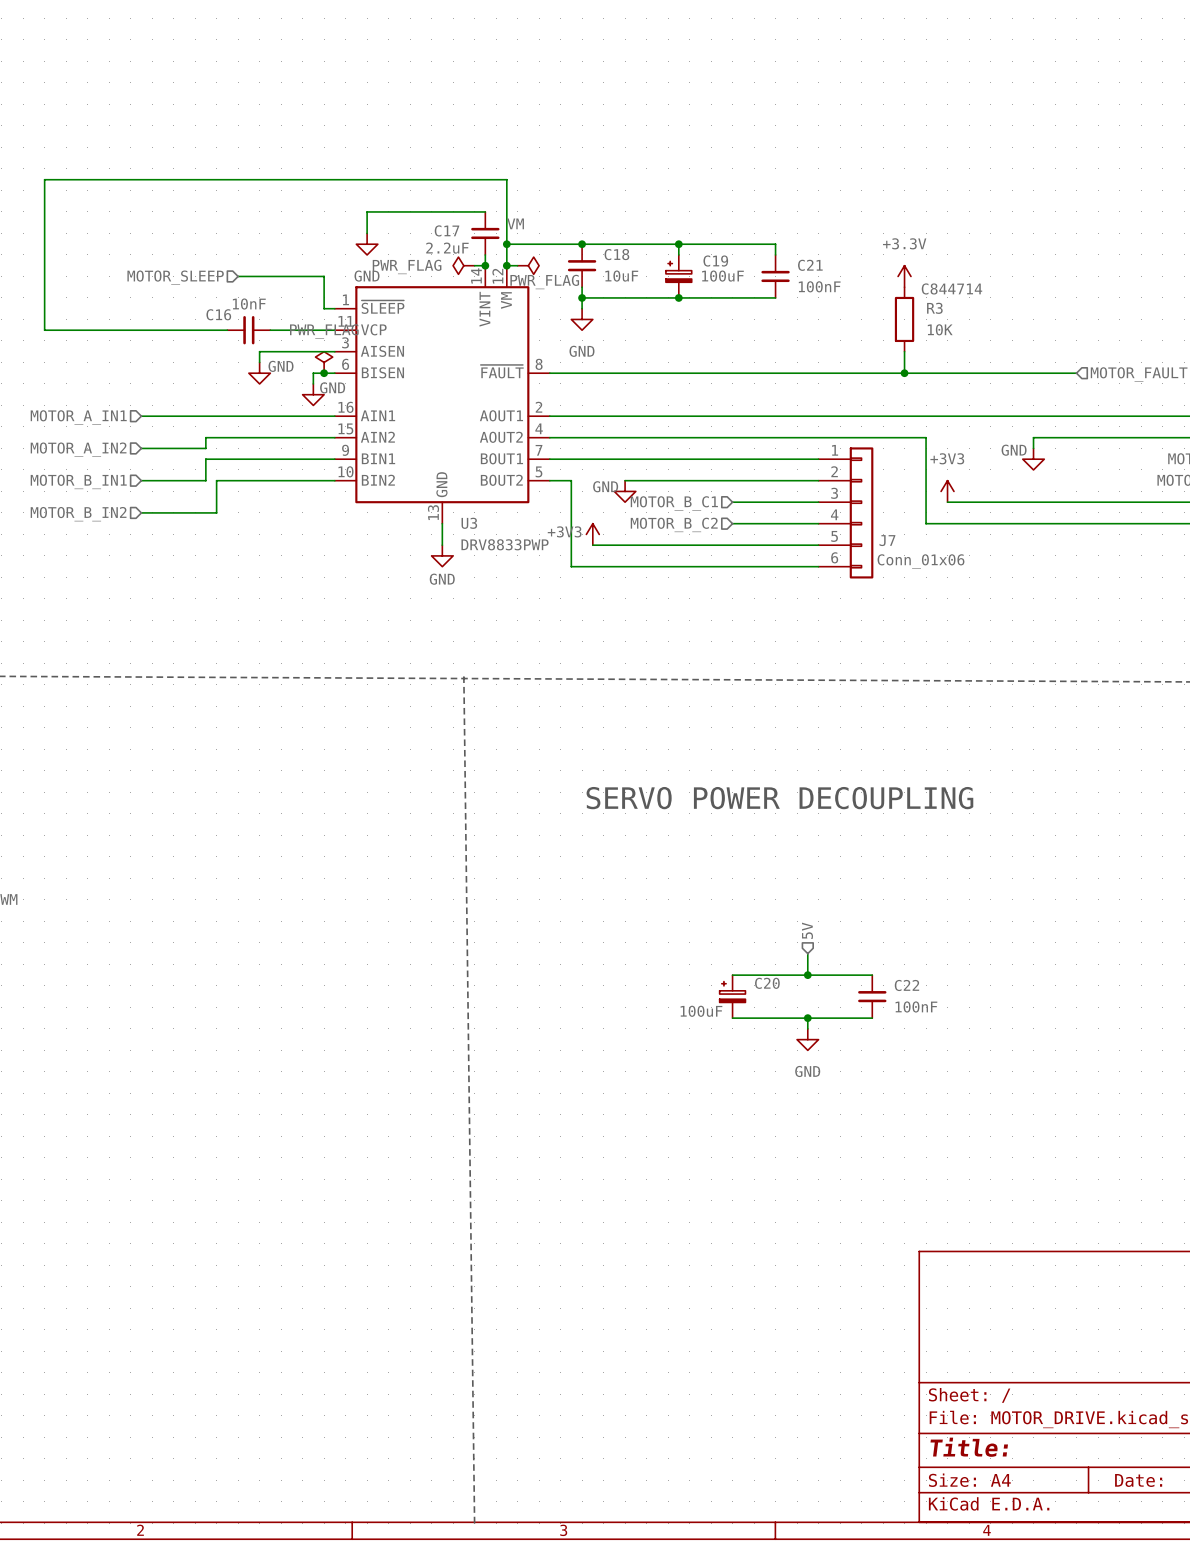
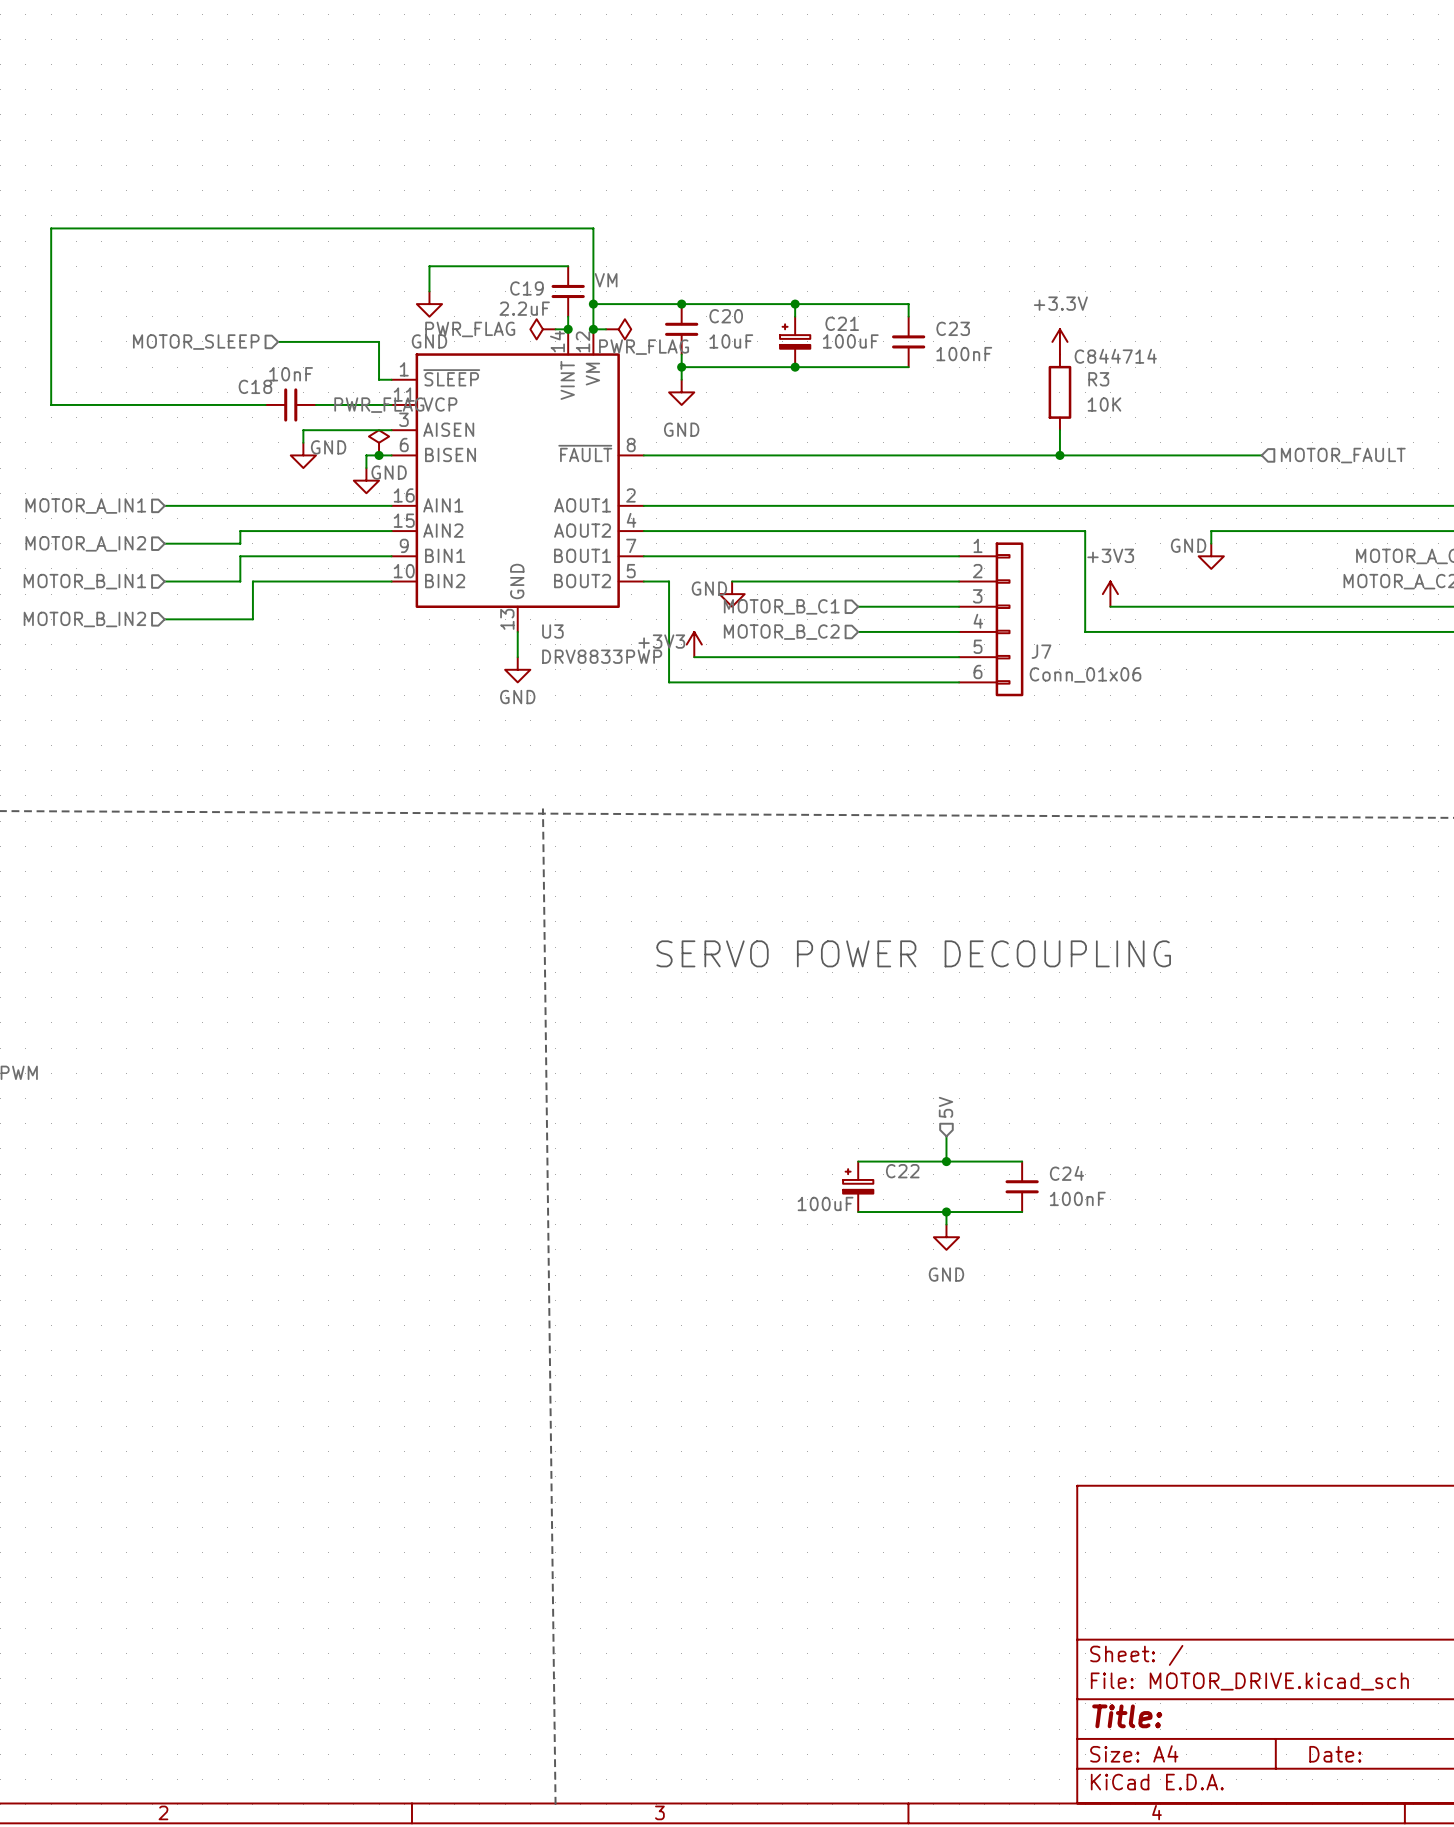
C17 name: C17 (447, 230) -> C19 (526, 288)
C18 name: C18 (616, 254) -> C20 (726, 316)
C19 name: C19 (715, 261) -> C21 (842, 323)
C21 name: C21 (810, 265) -> C23 (953, 328)
C16 name: C16 (218, 314) -> C18 (255, 386)
C20 name: C20 (767, 983) -> C22 (902, 1171)
C22 name: C22 (906, 985) -> C24 (1066, 1173)

